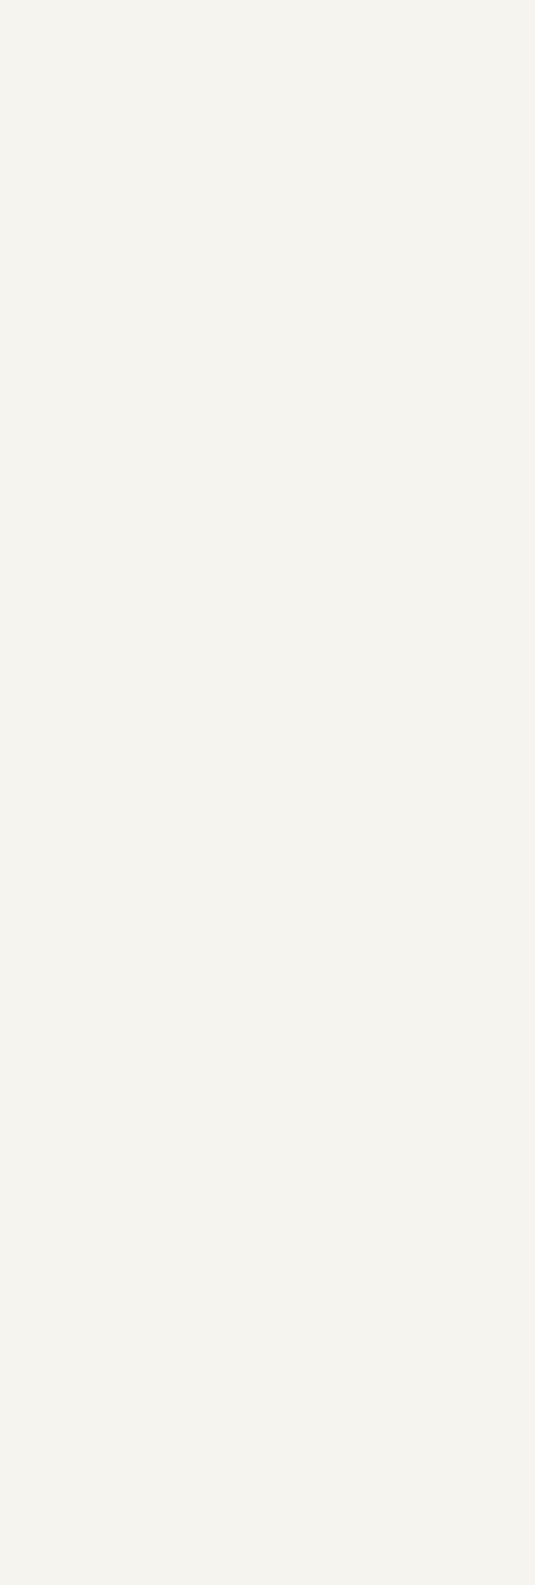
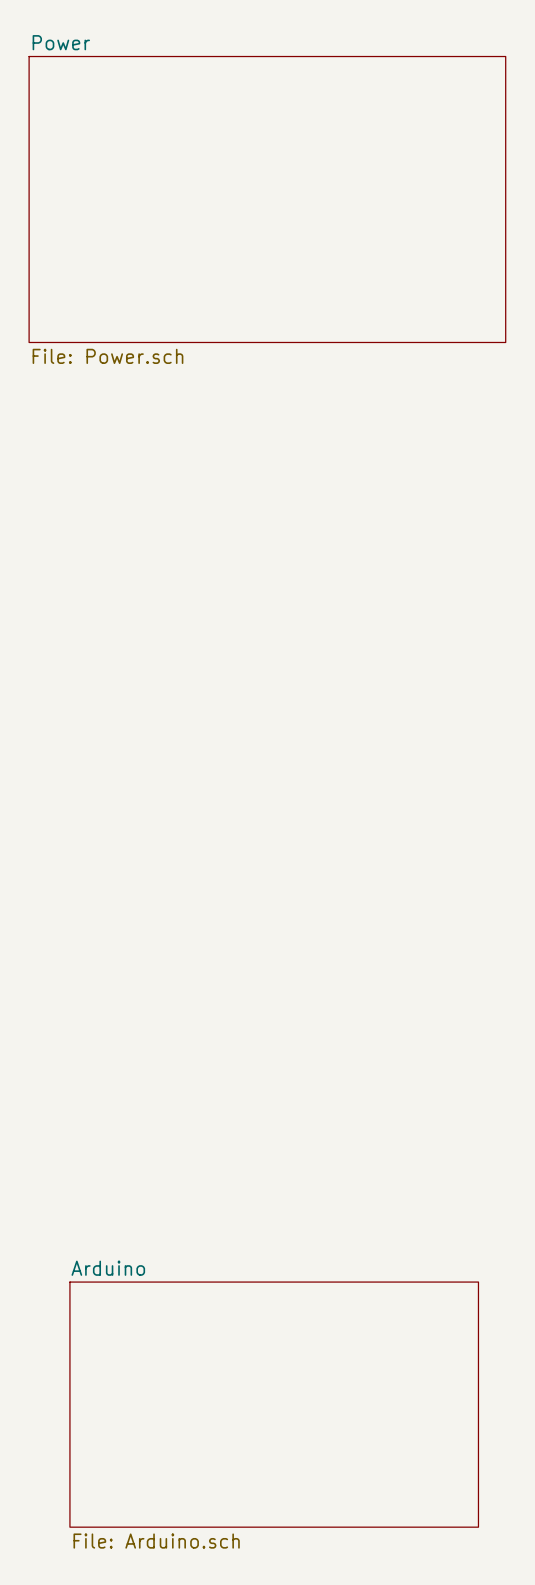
sheet Power: none -> File: Power.sch (267, 199)
sheet Arduino: none -> File: Arduino.sch (274, 1404)

